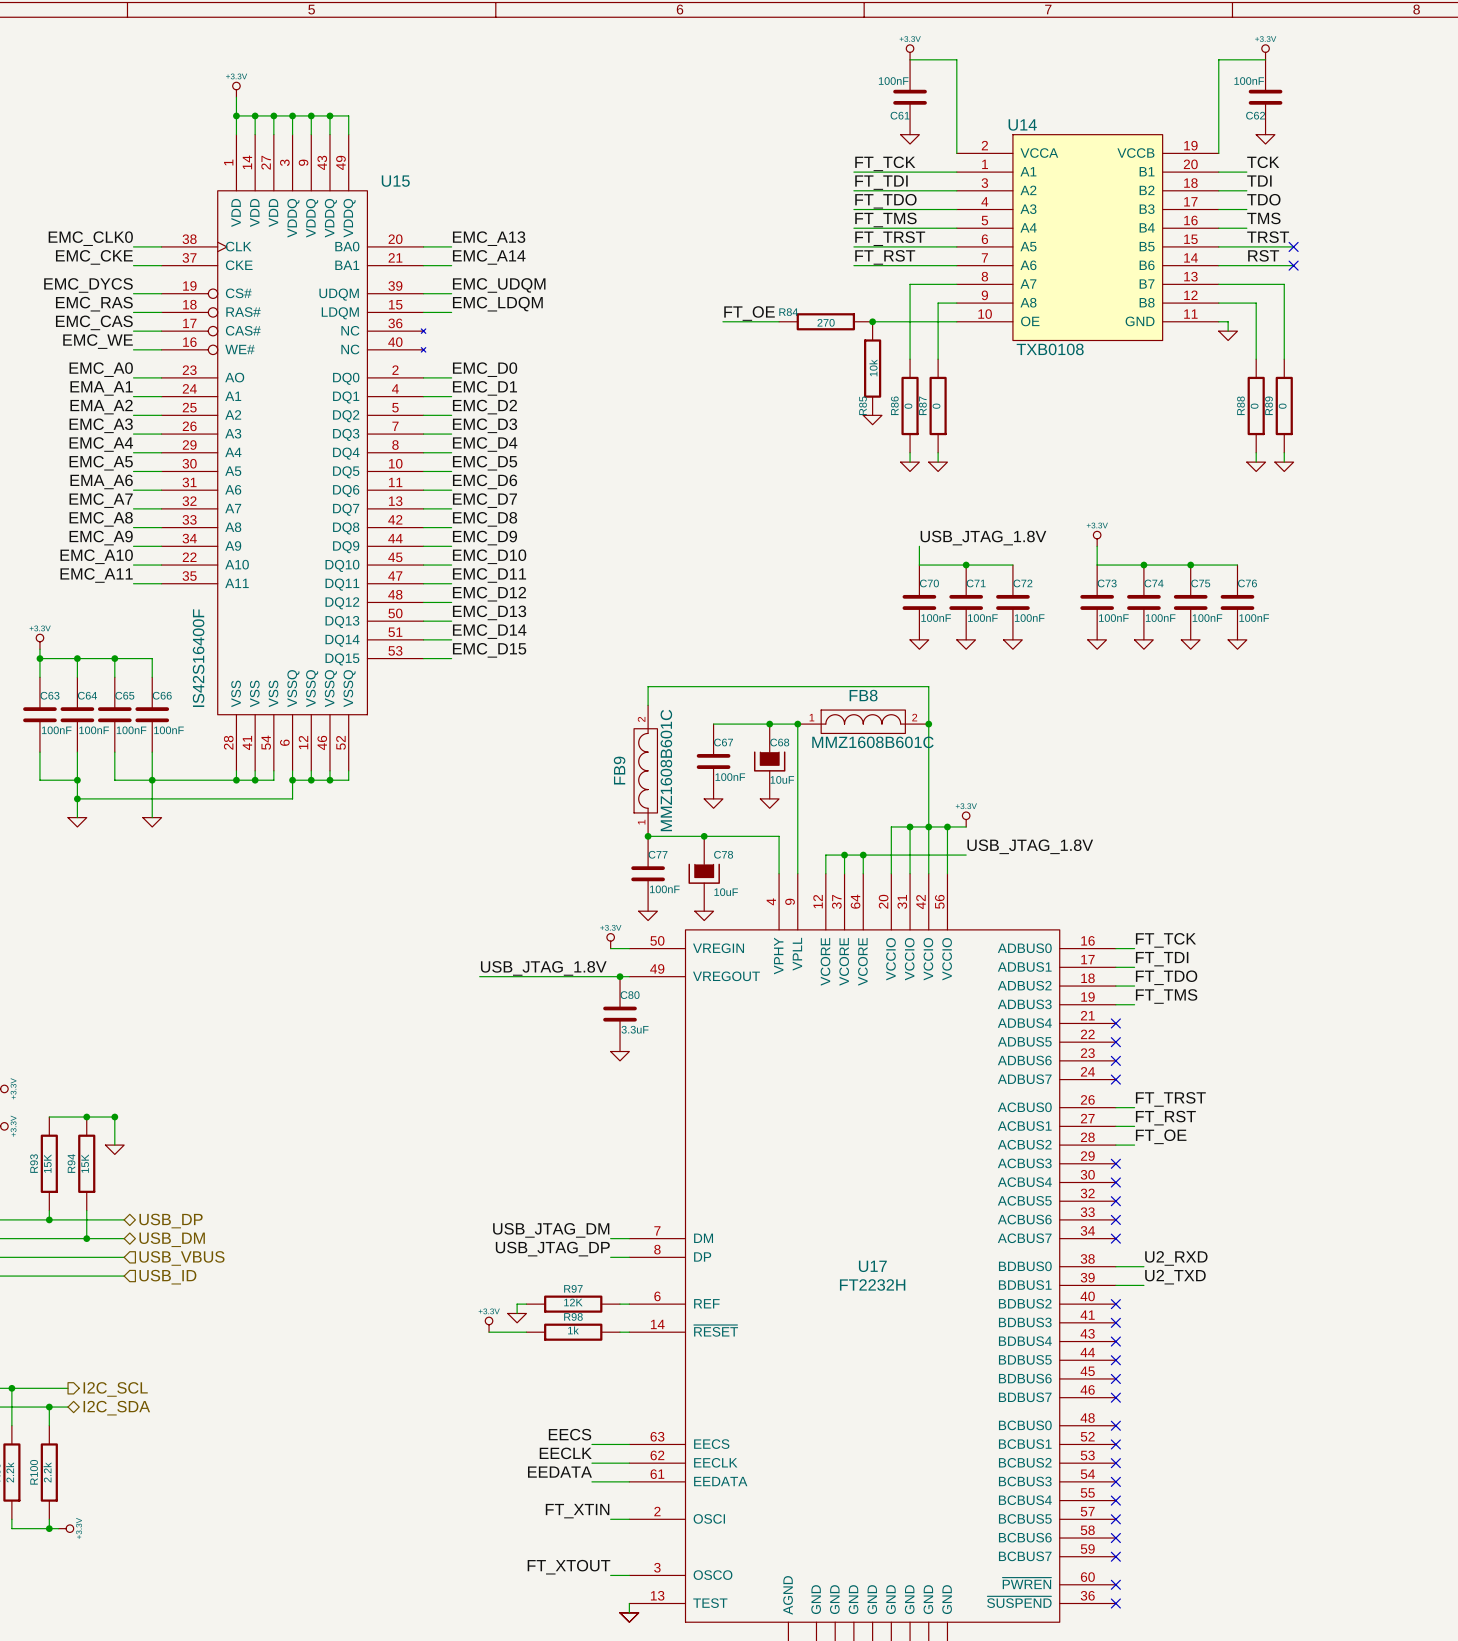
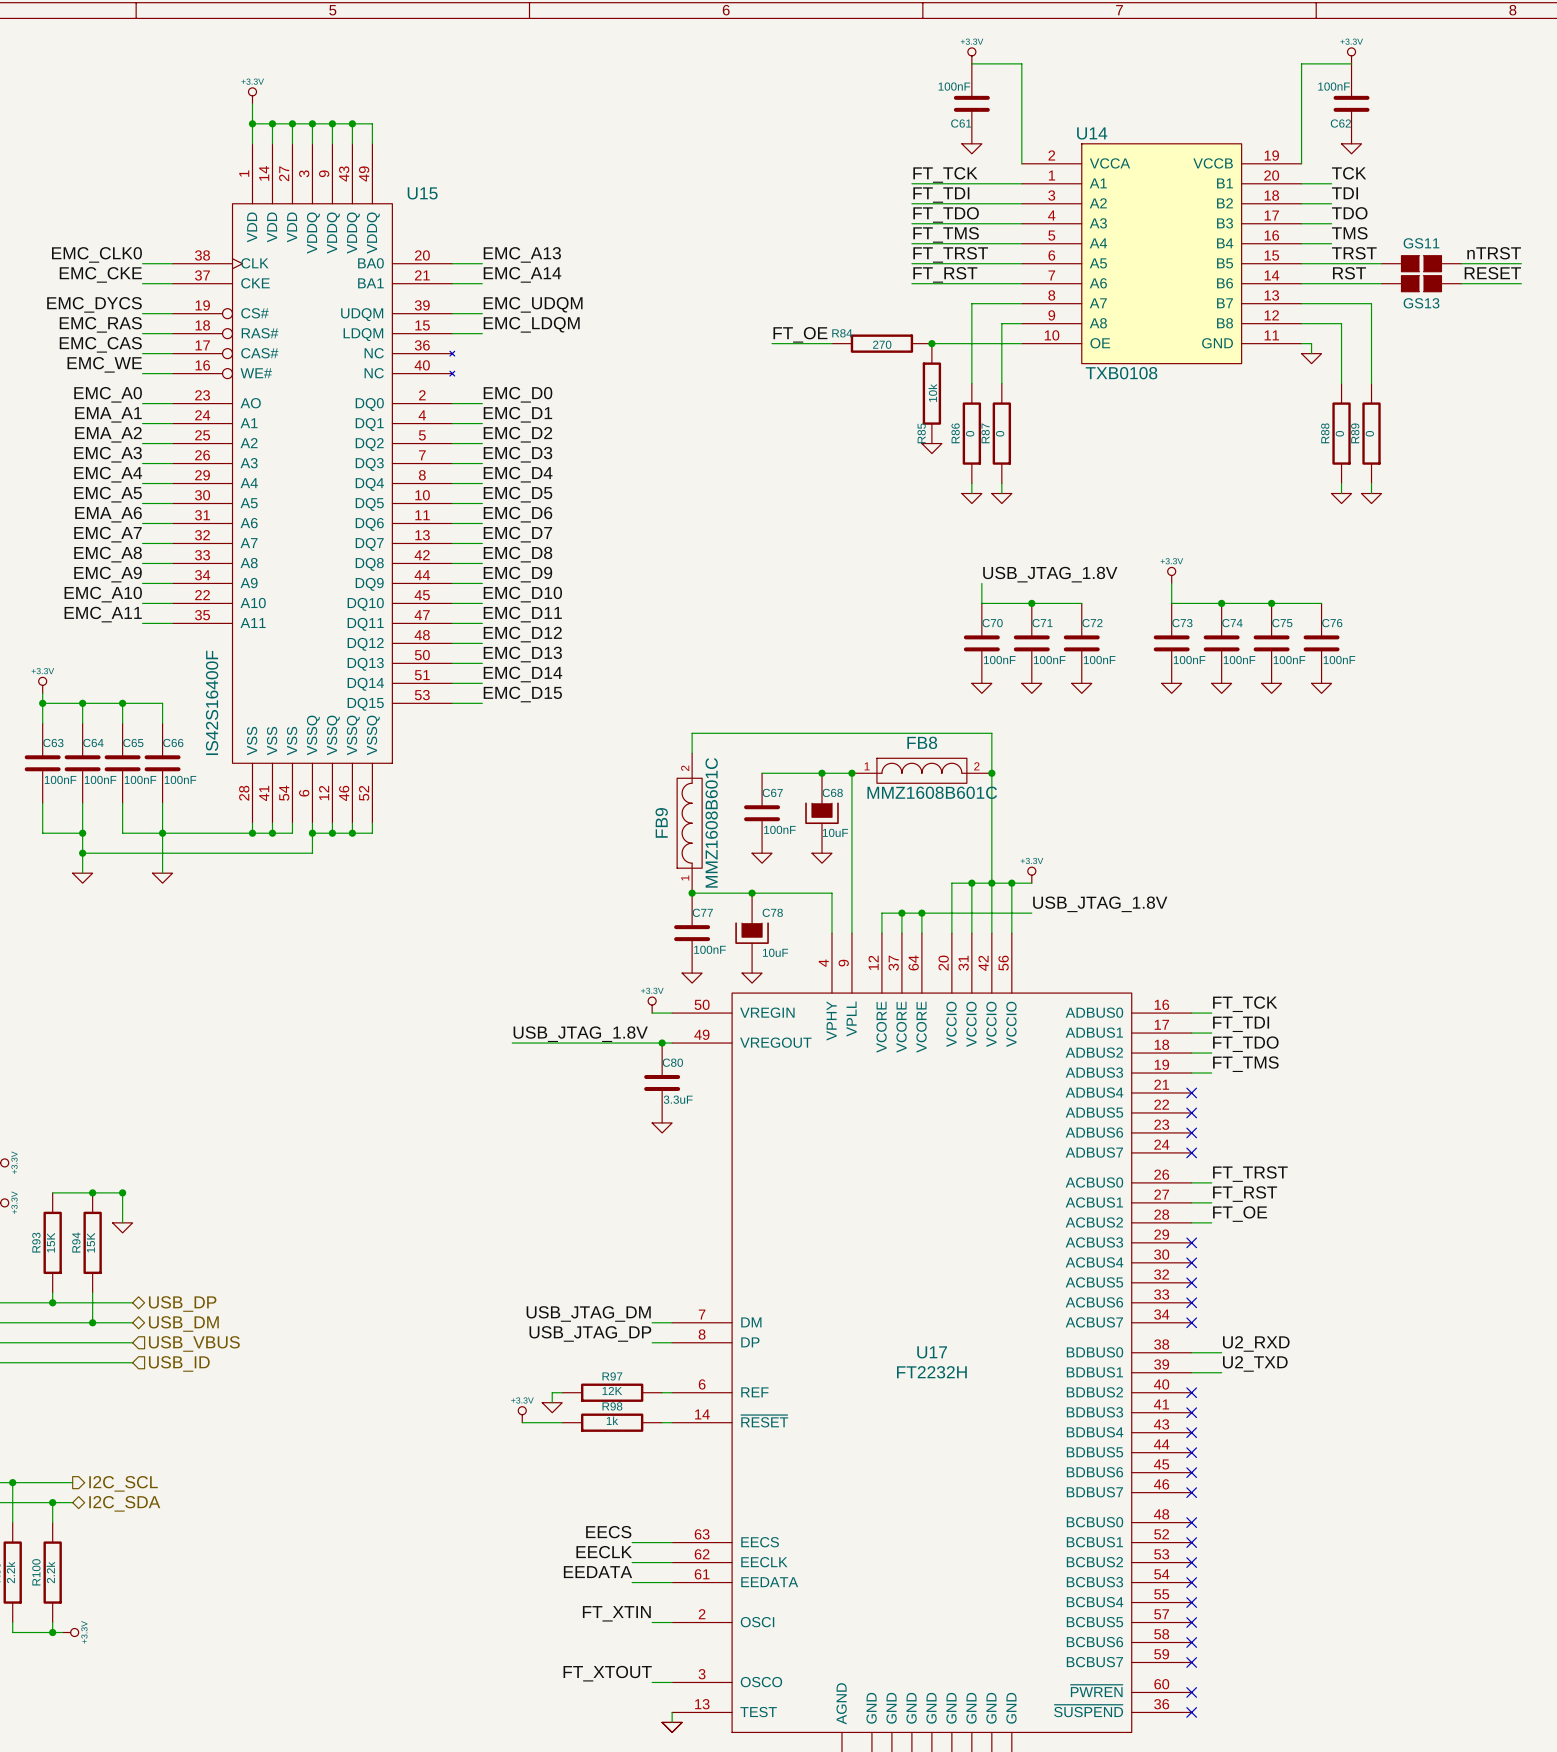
label: none -> nTRST (1494, 253)
no-connect mark: (1293, 246) -> none
GS11: none -> (1421, 263)
wire: none -> (1461, 263) (1521, 263)
label: none -> RESET (1492, 273)
no-connect mark: (1293, 265) -> none
GS13: none -> (1421, 283)
wire: none -> (1461, 283) (1521, 283)

